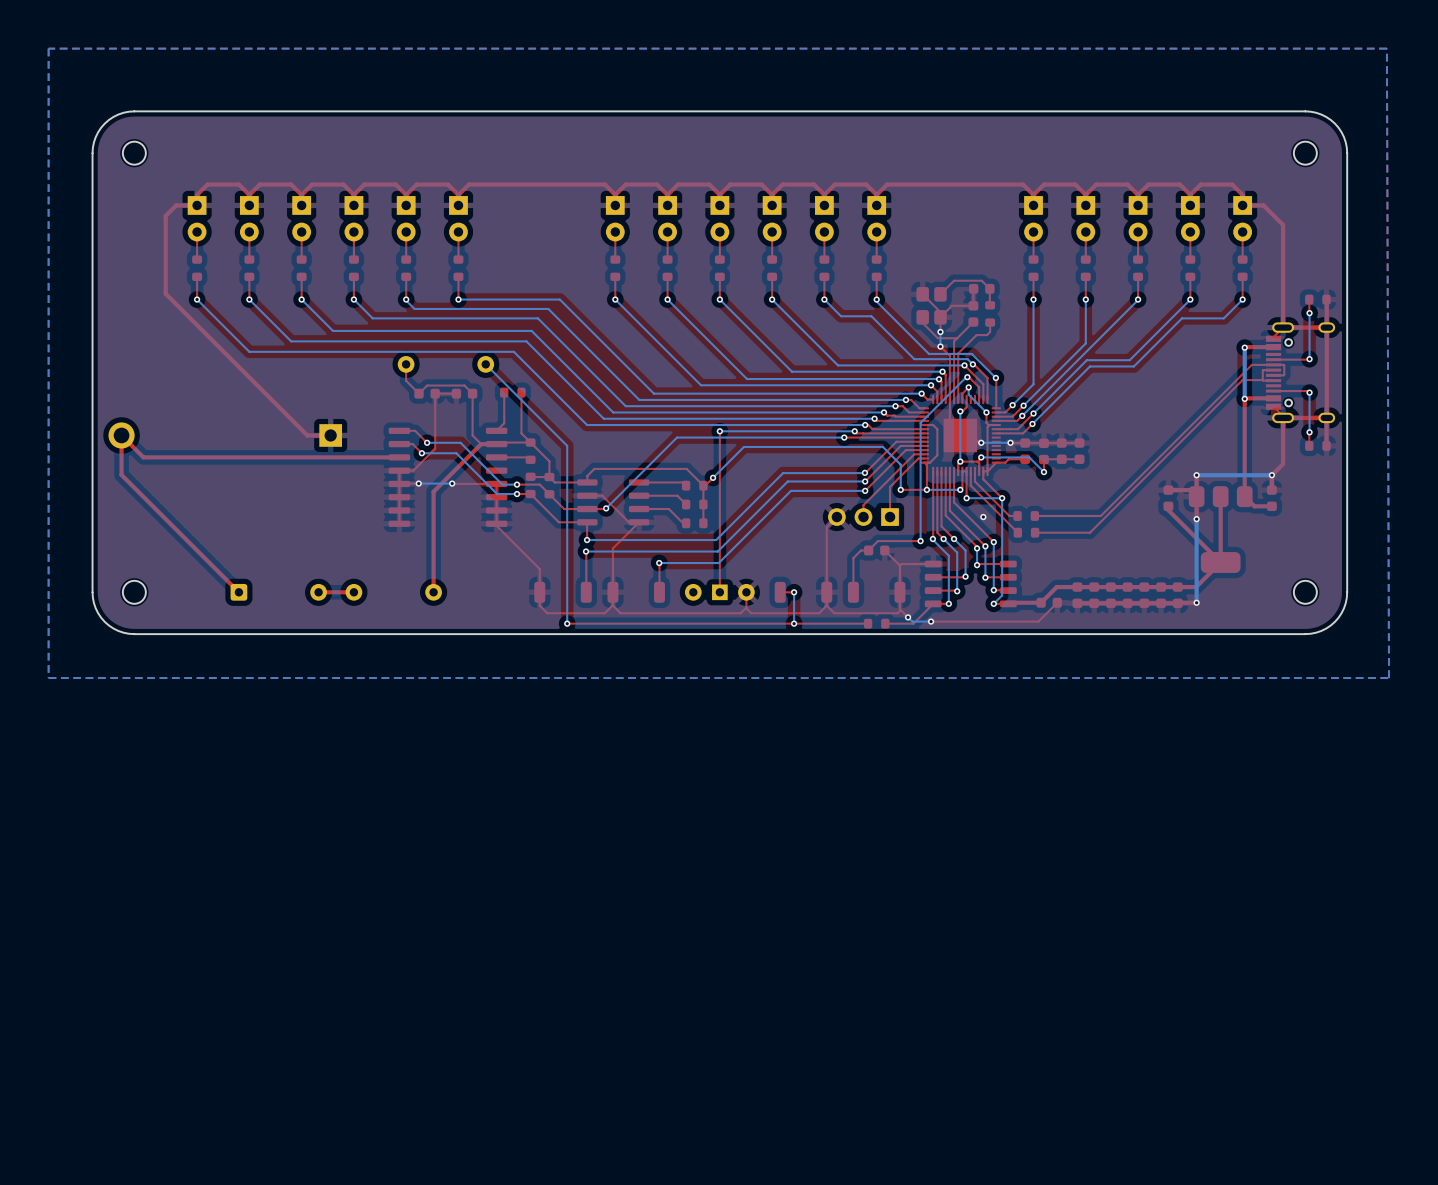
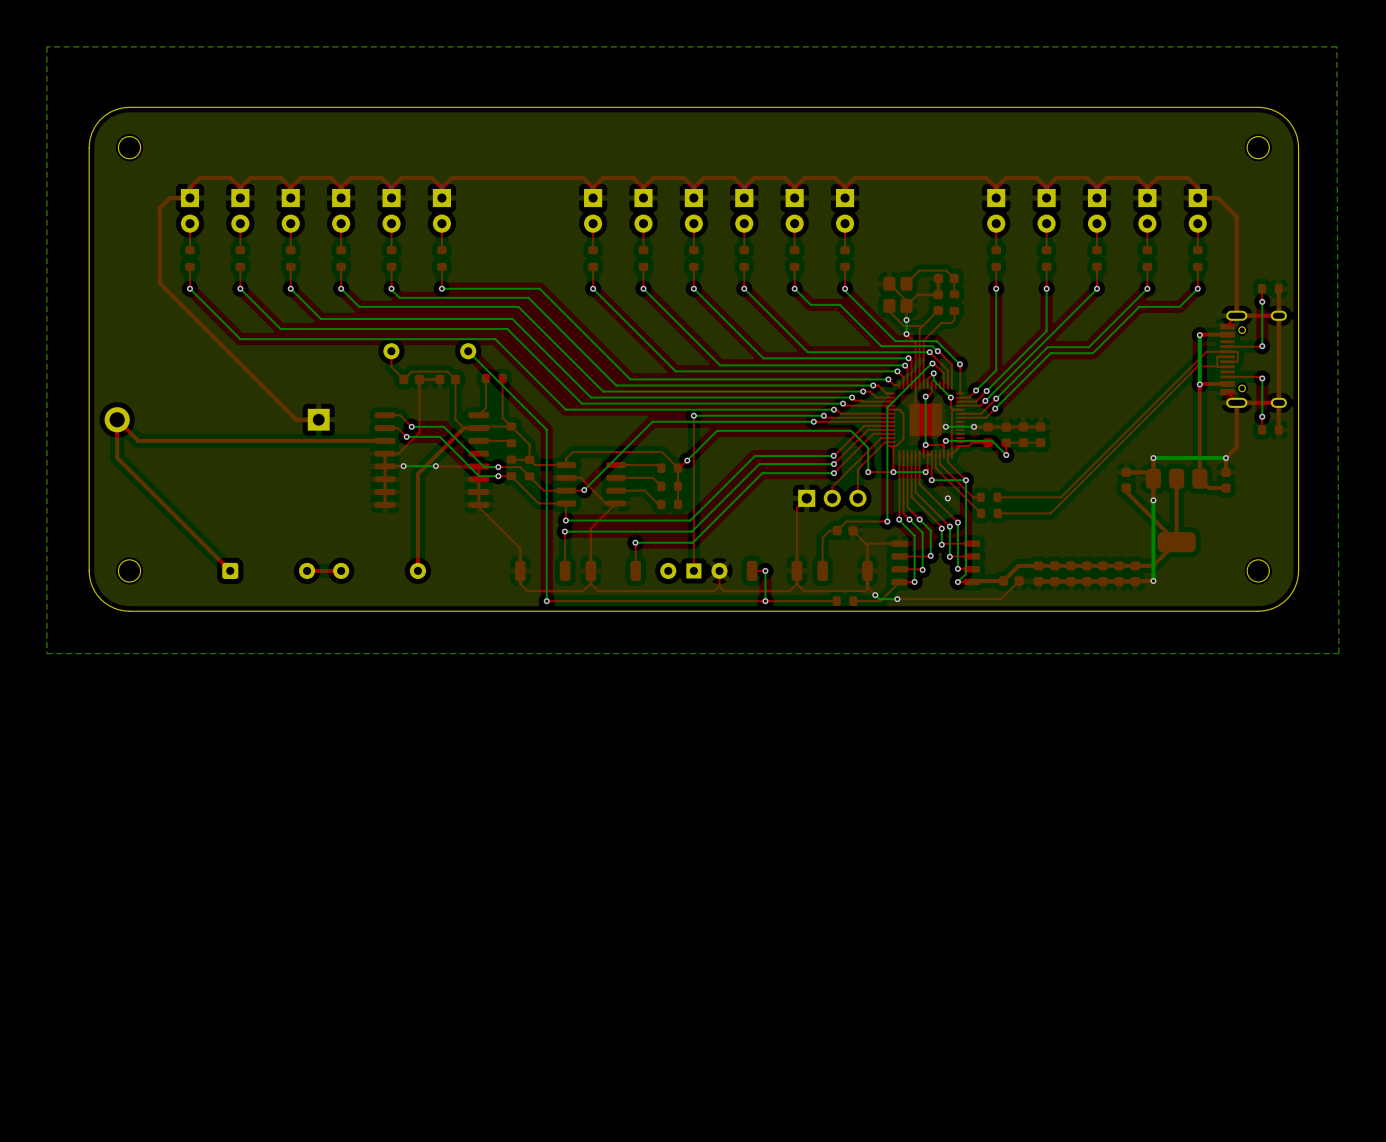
part rotation: 0° (863, 517) -> 180° (832, 498)

